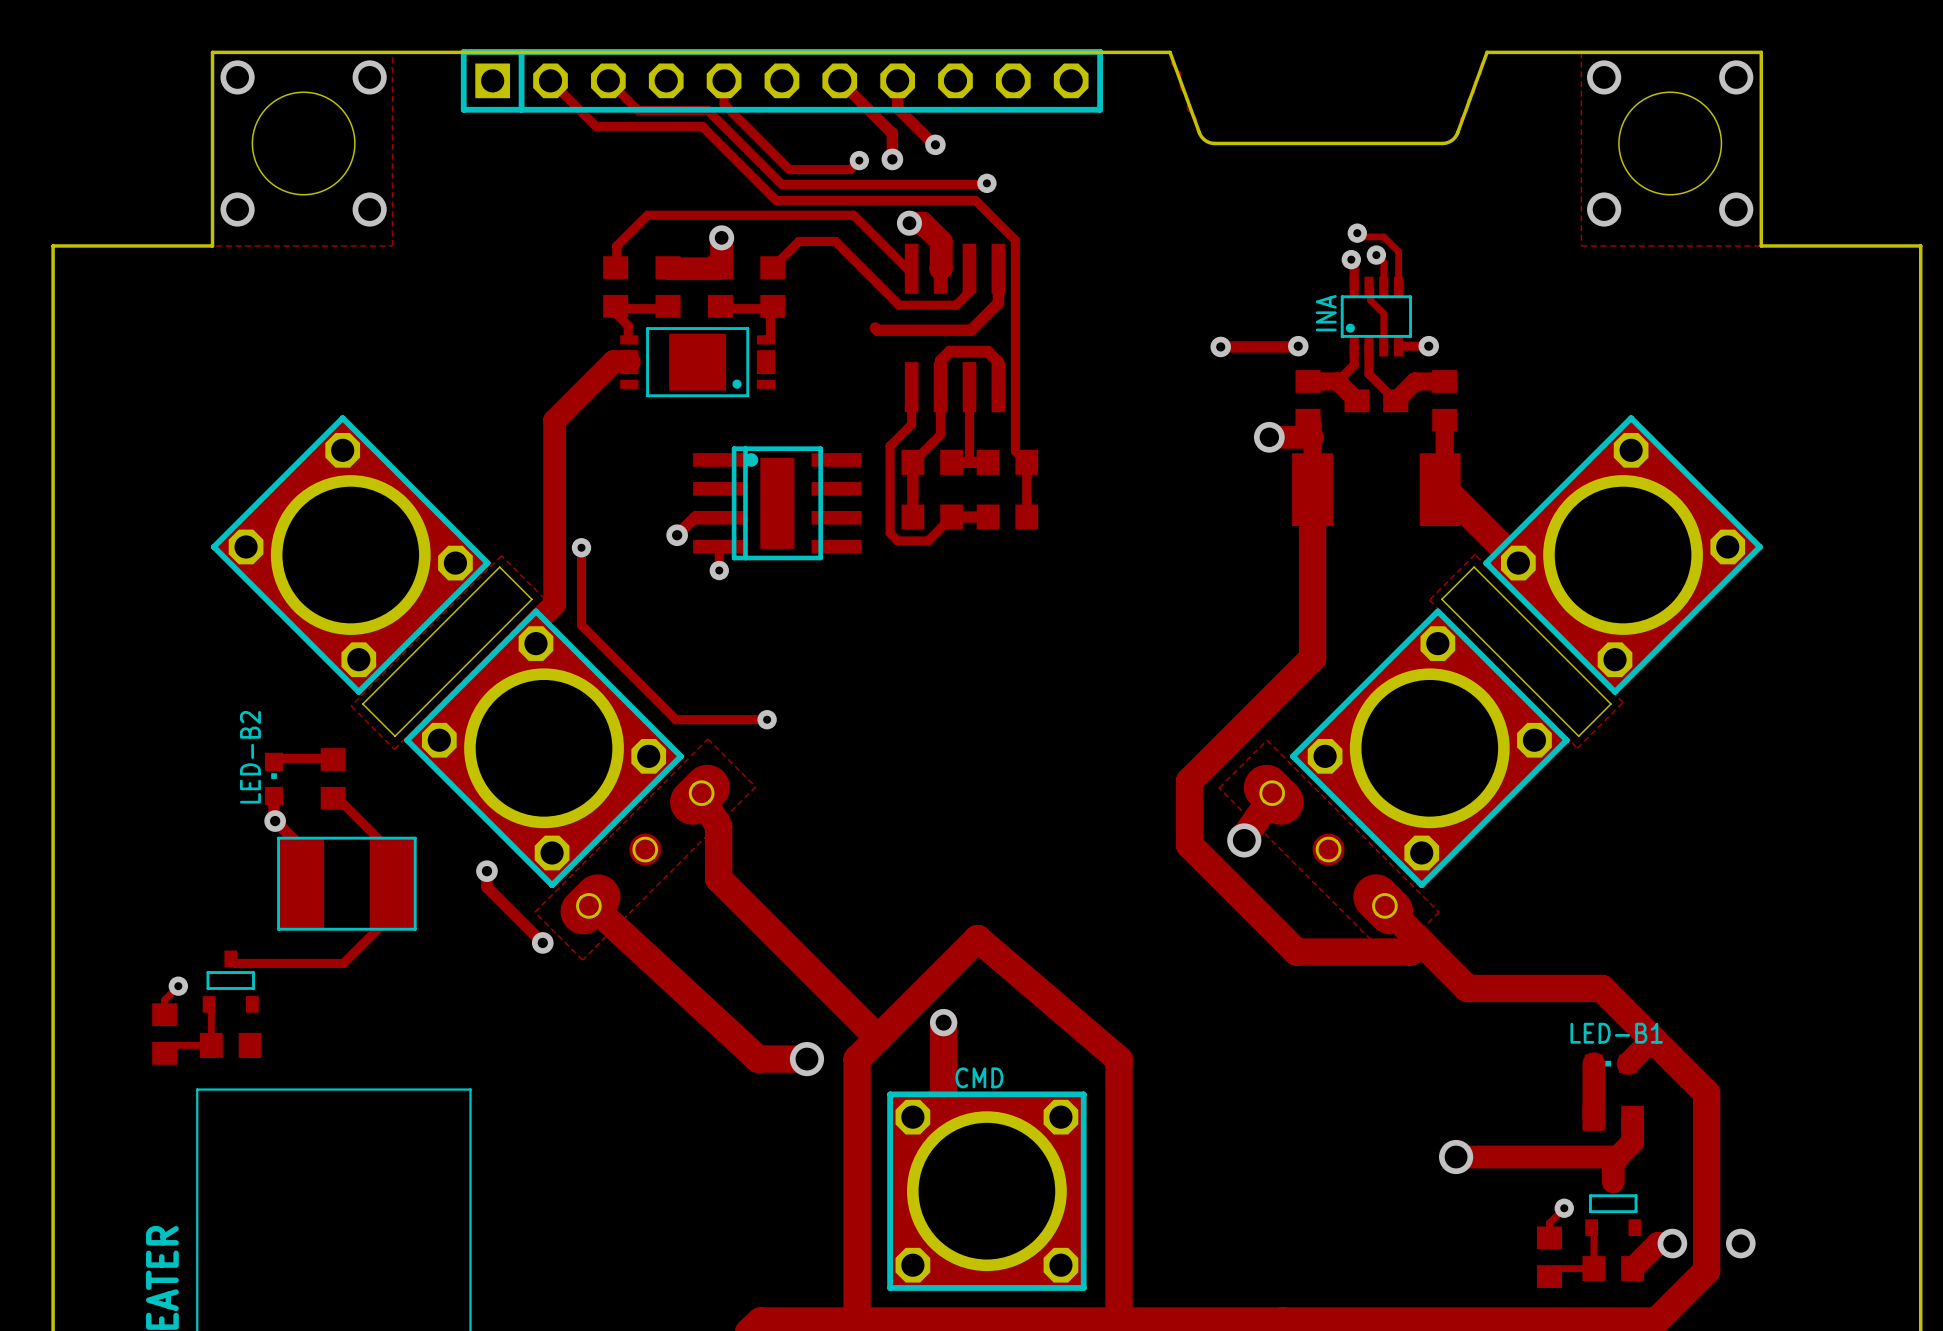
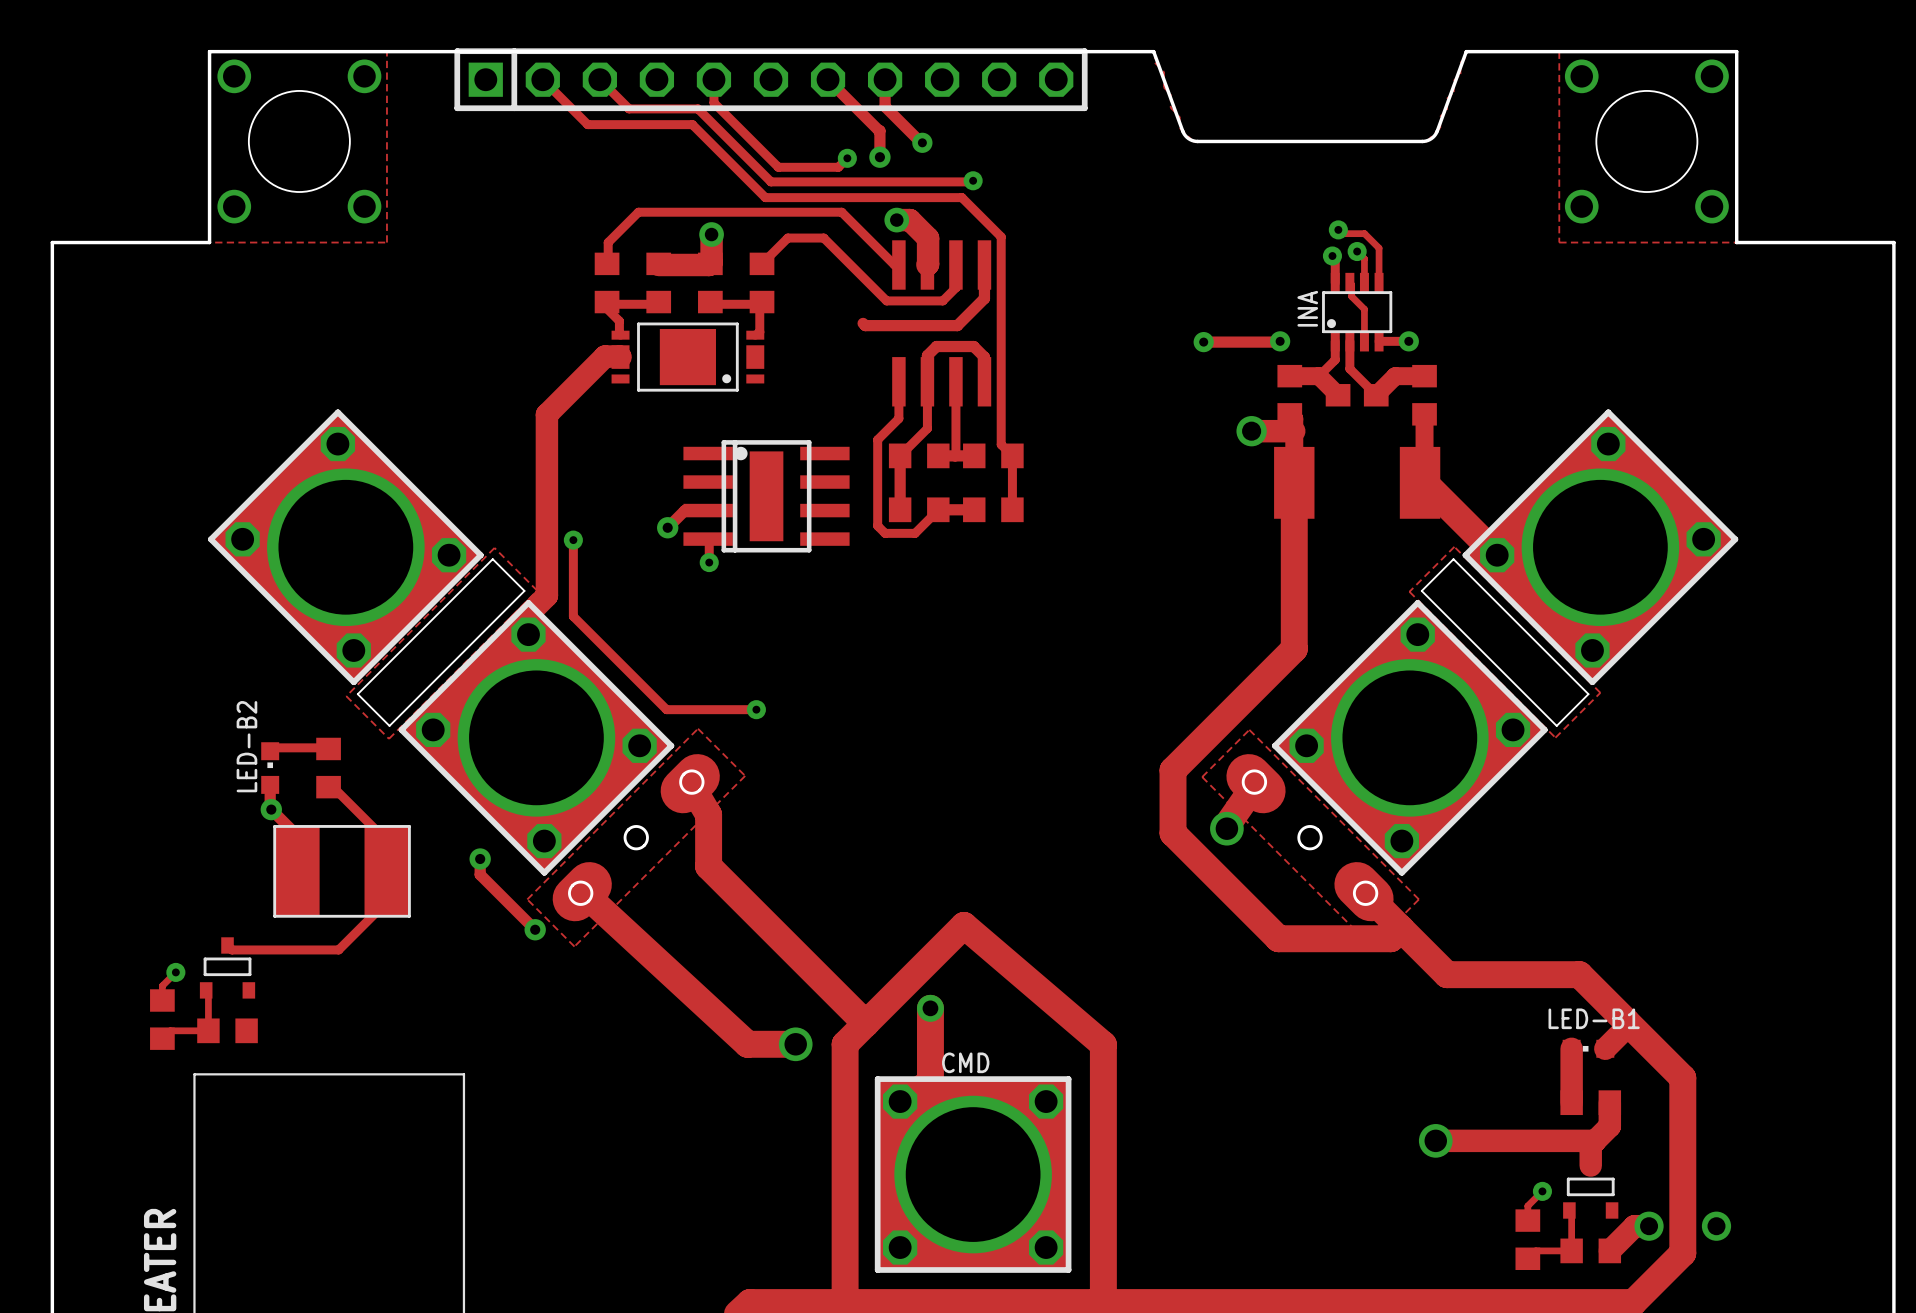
part footprint: [560, 764, 731, 935] -> [552, 754, 720, 922]
part footprint: [1243, 764, 1414, 935] -> [1226, 754, 1394, 922]

